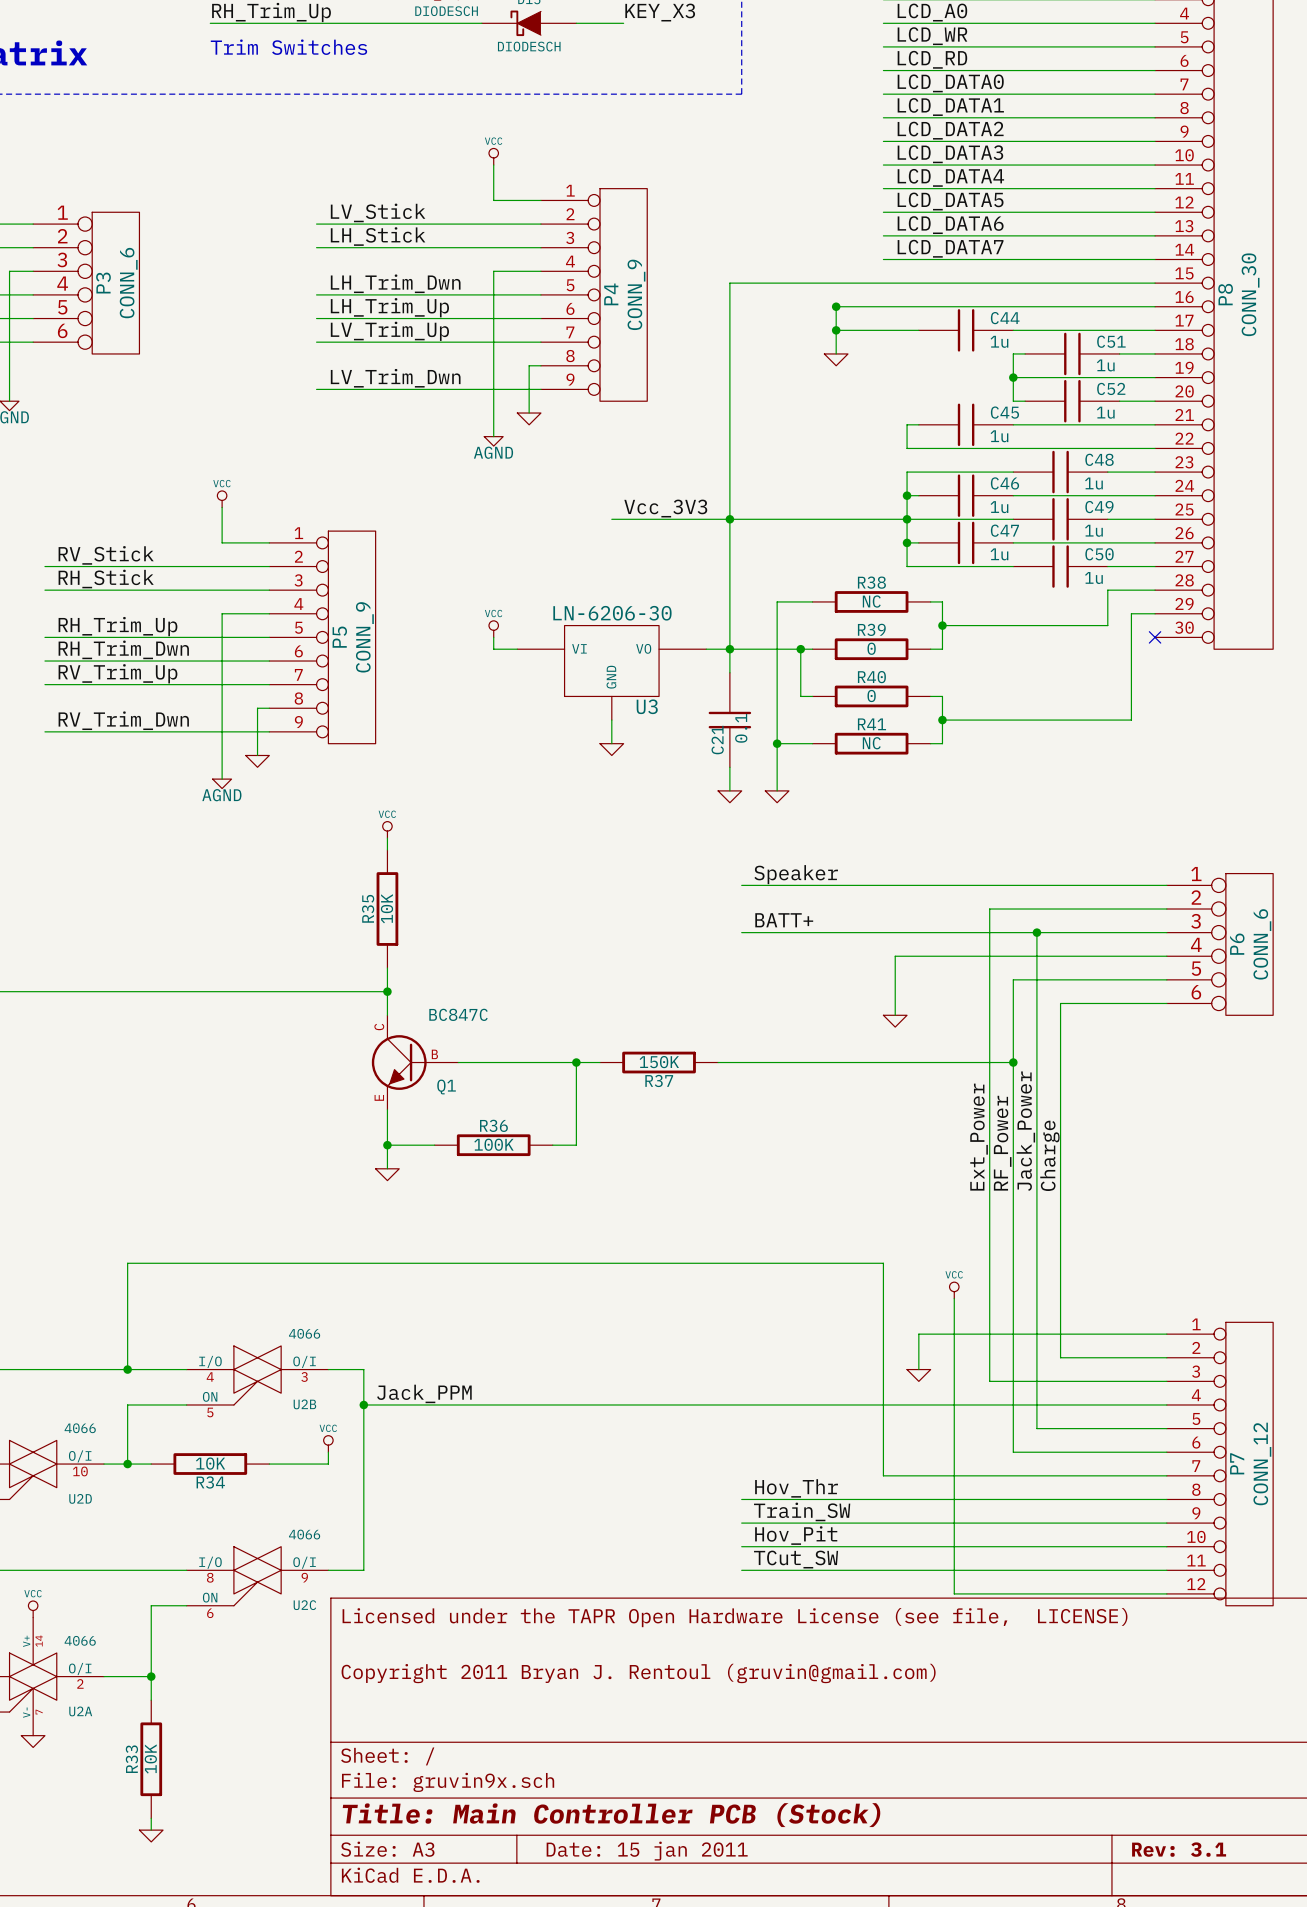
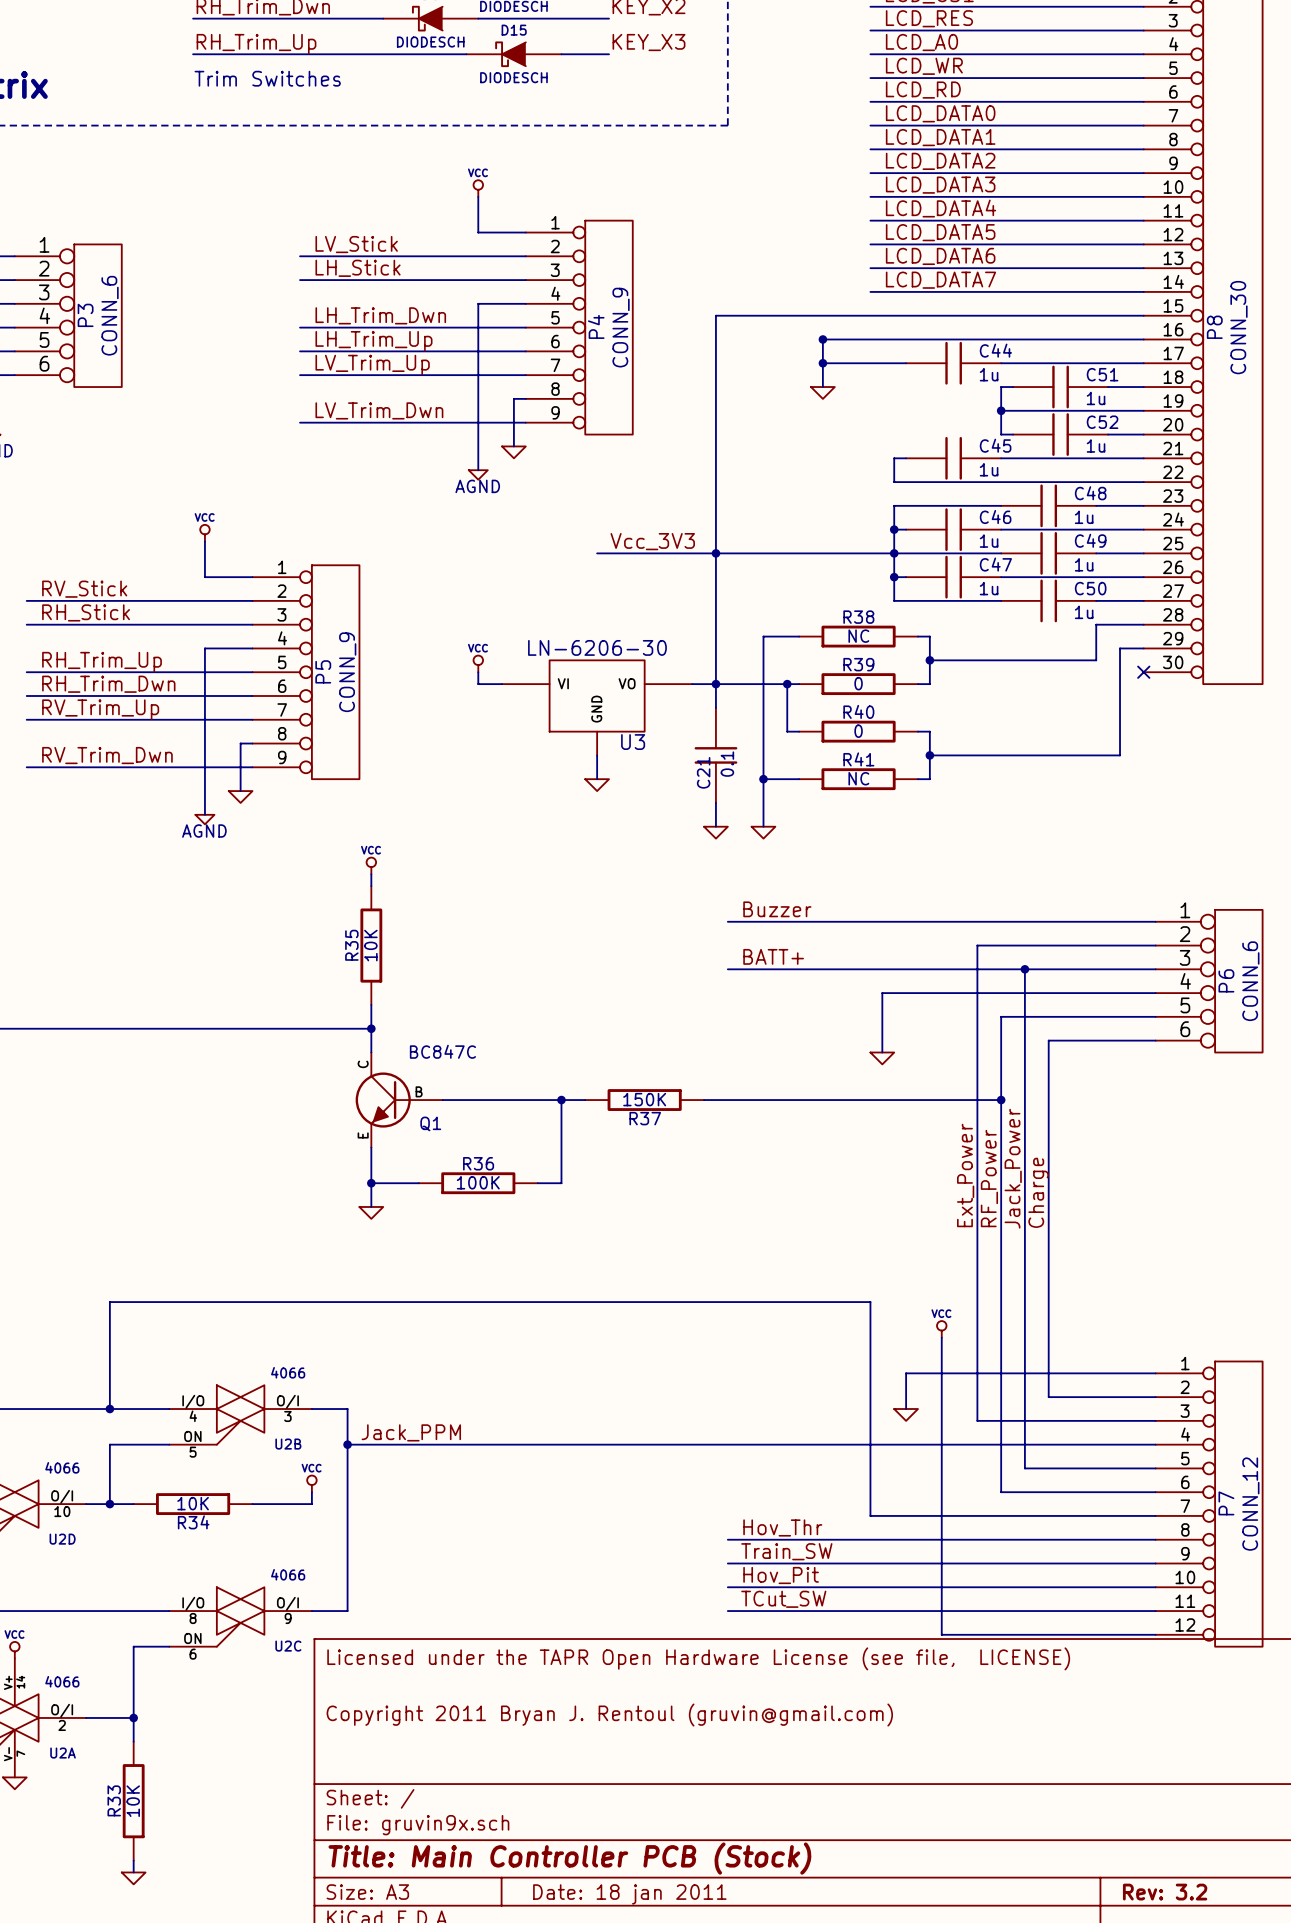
label: Speaker (796, 874) -> Buzzer (777, 909)
title block: Rev: 3.1 (1179, 1849) -> Rev: 3.2 (1165, 1892)
title block: Date: 15 jan 2011 (647, 1851) -> Date: 18 jan 2011 (629, 1894)

